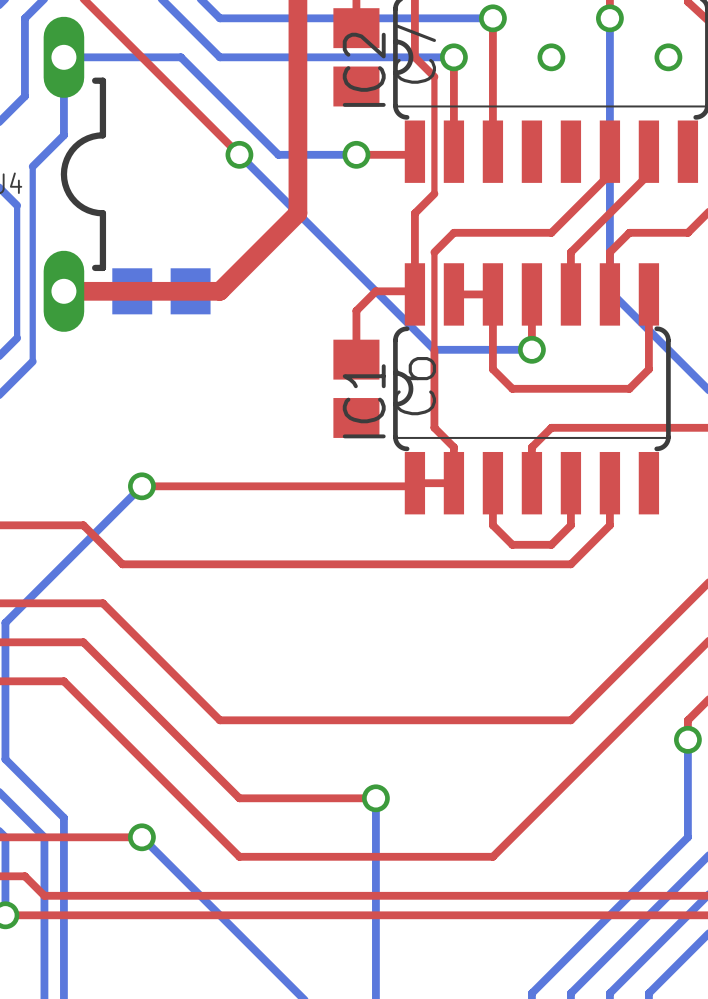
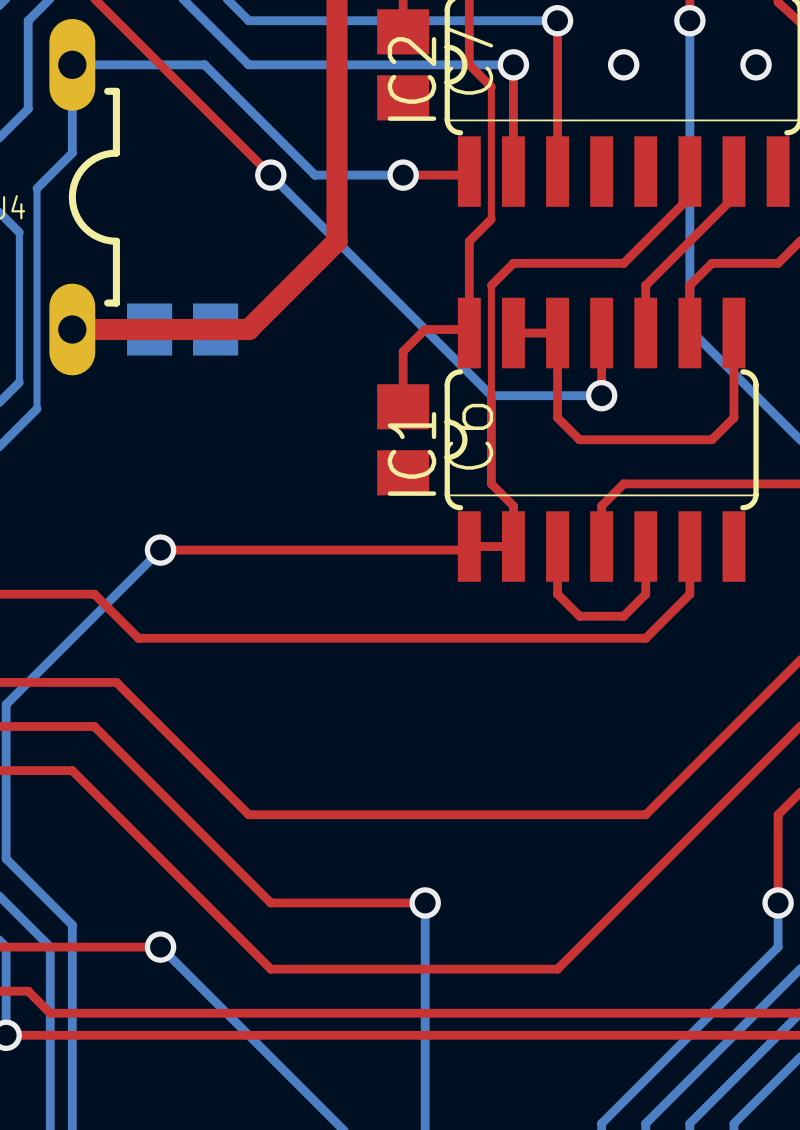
top track: none -> (778, 836) (778, 902)
bottom track: (687, 739) (687, 798) -> none
via: (687, 739) -> none
via: none -> (778, 902)

